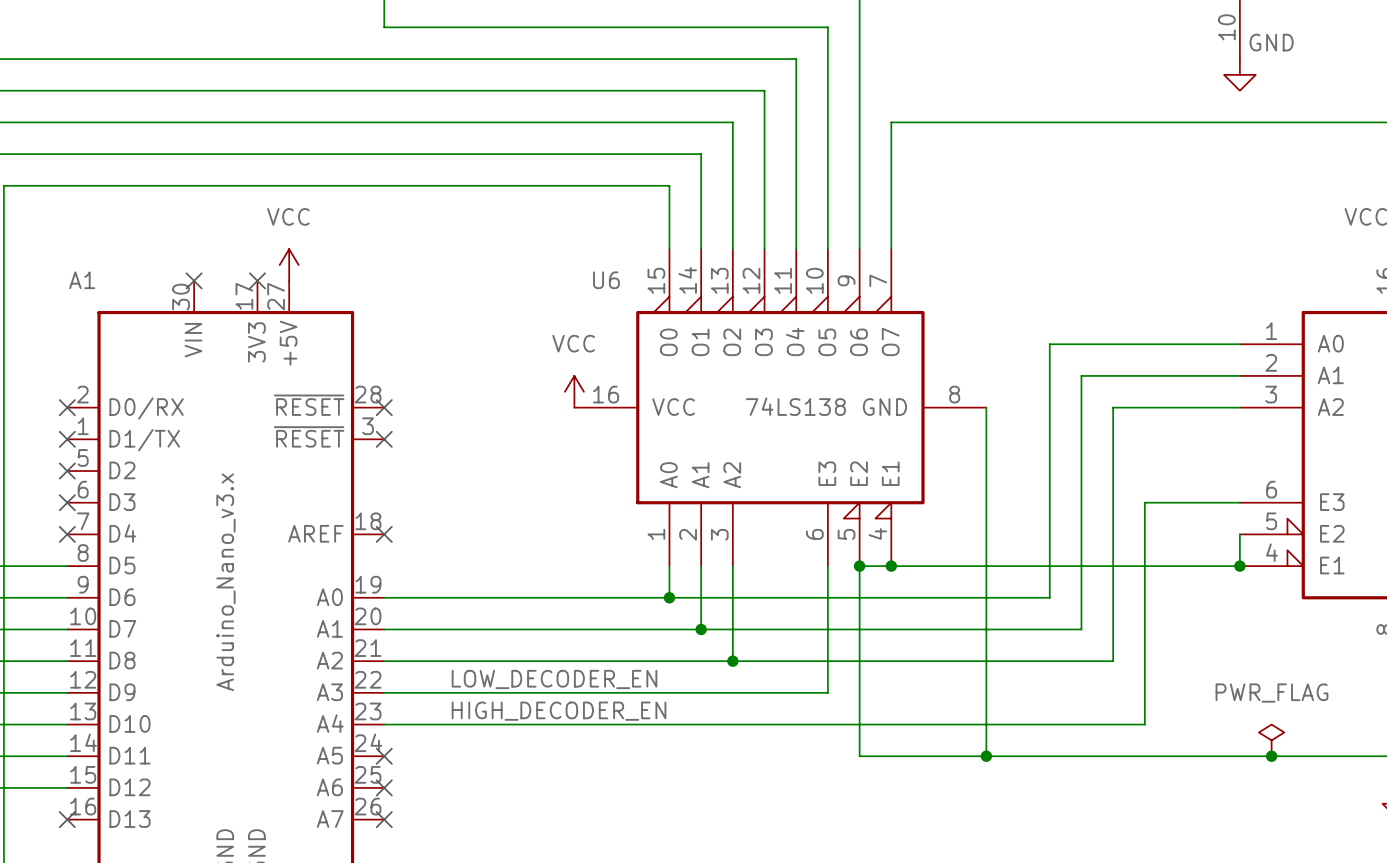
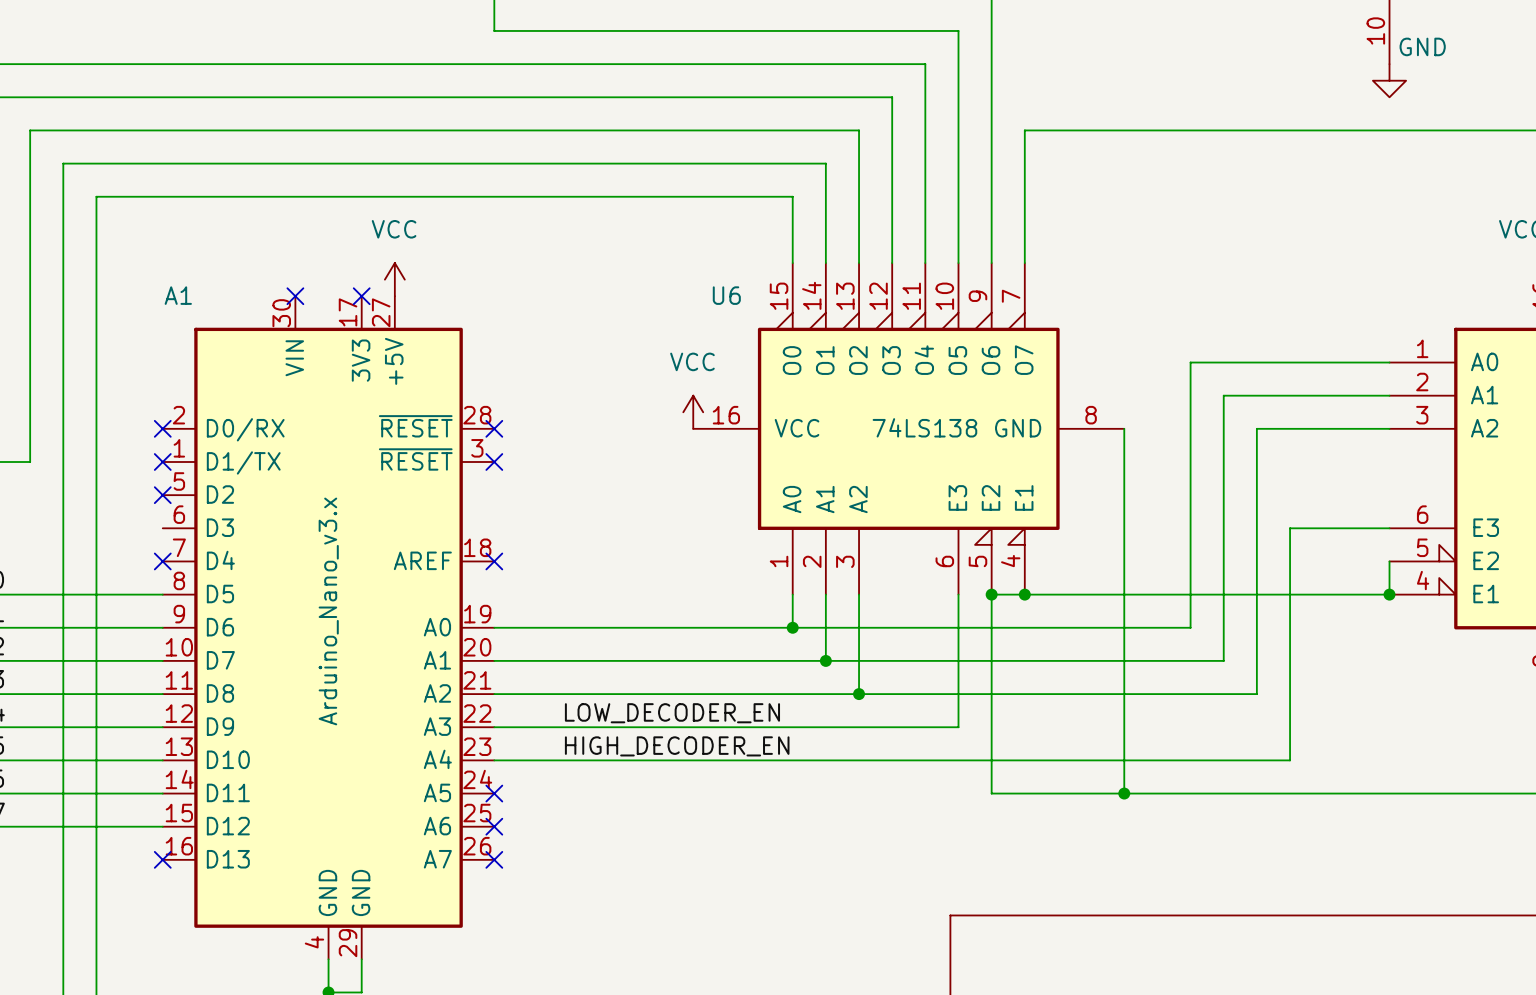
no-connect mark: (67, 502) -> none
power symbol: PWR_FLAG (1271, 740) -> none
junction: (1271, 756) -> none

